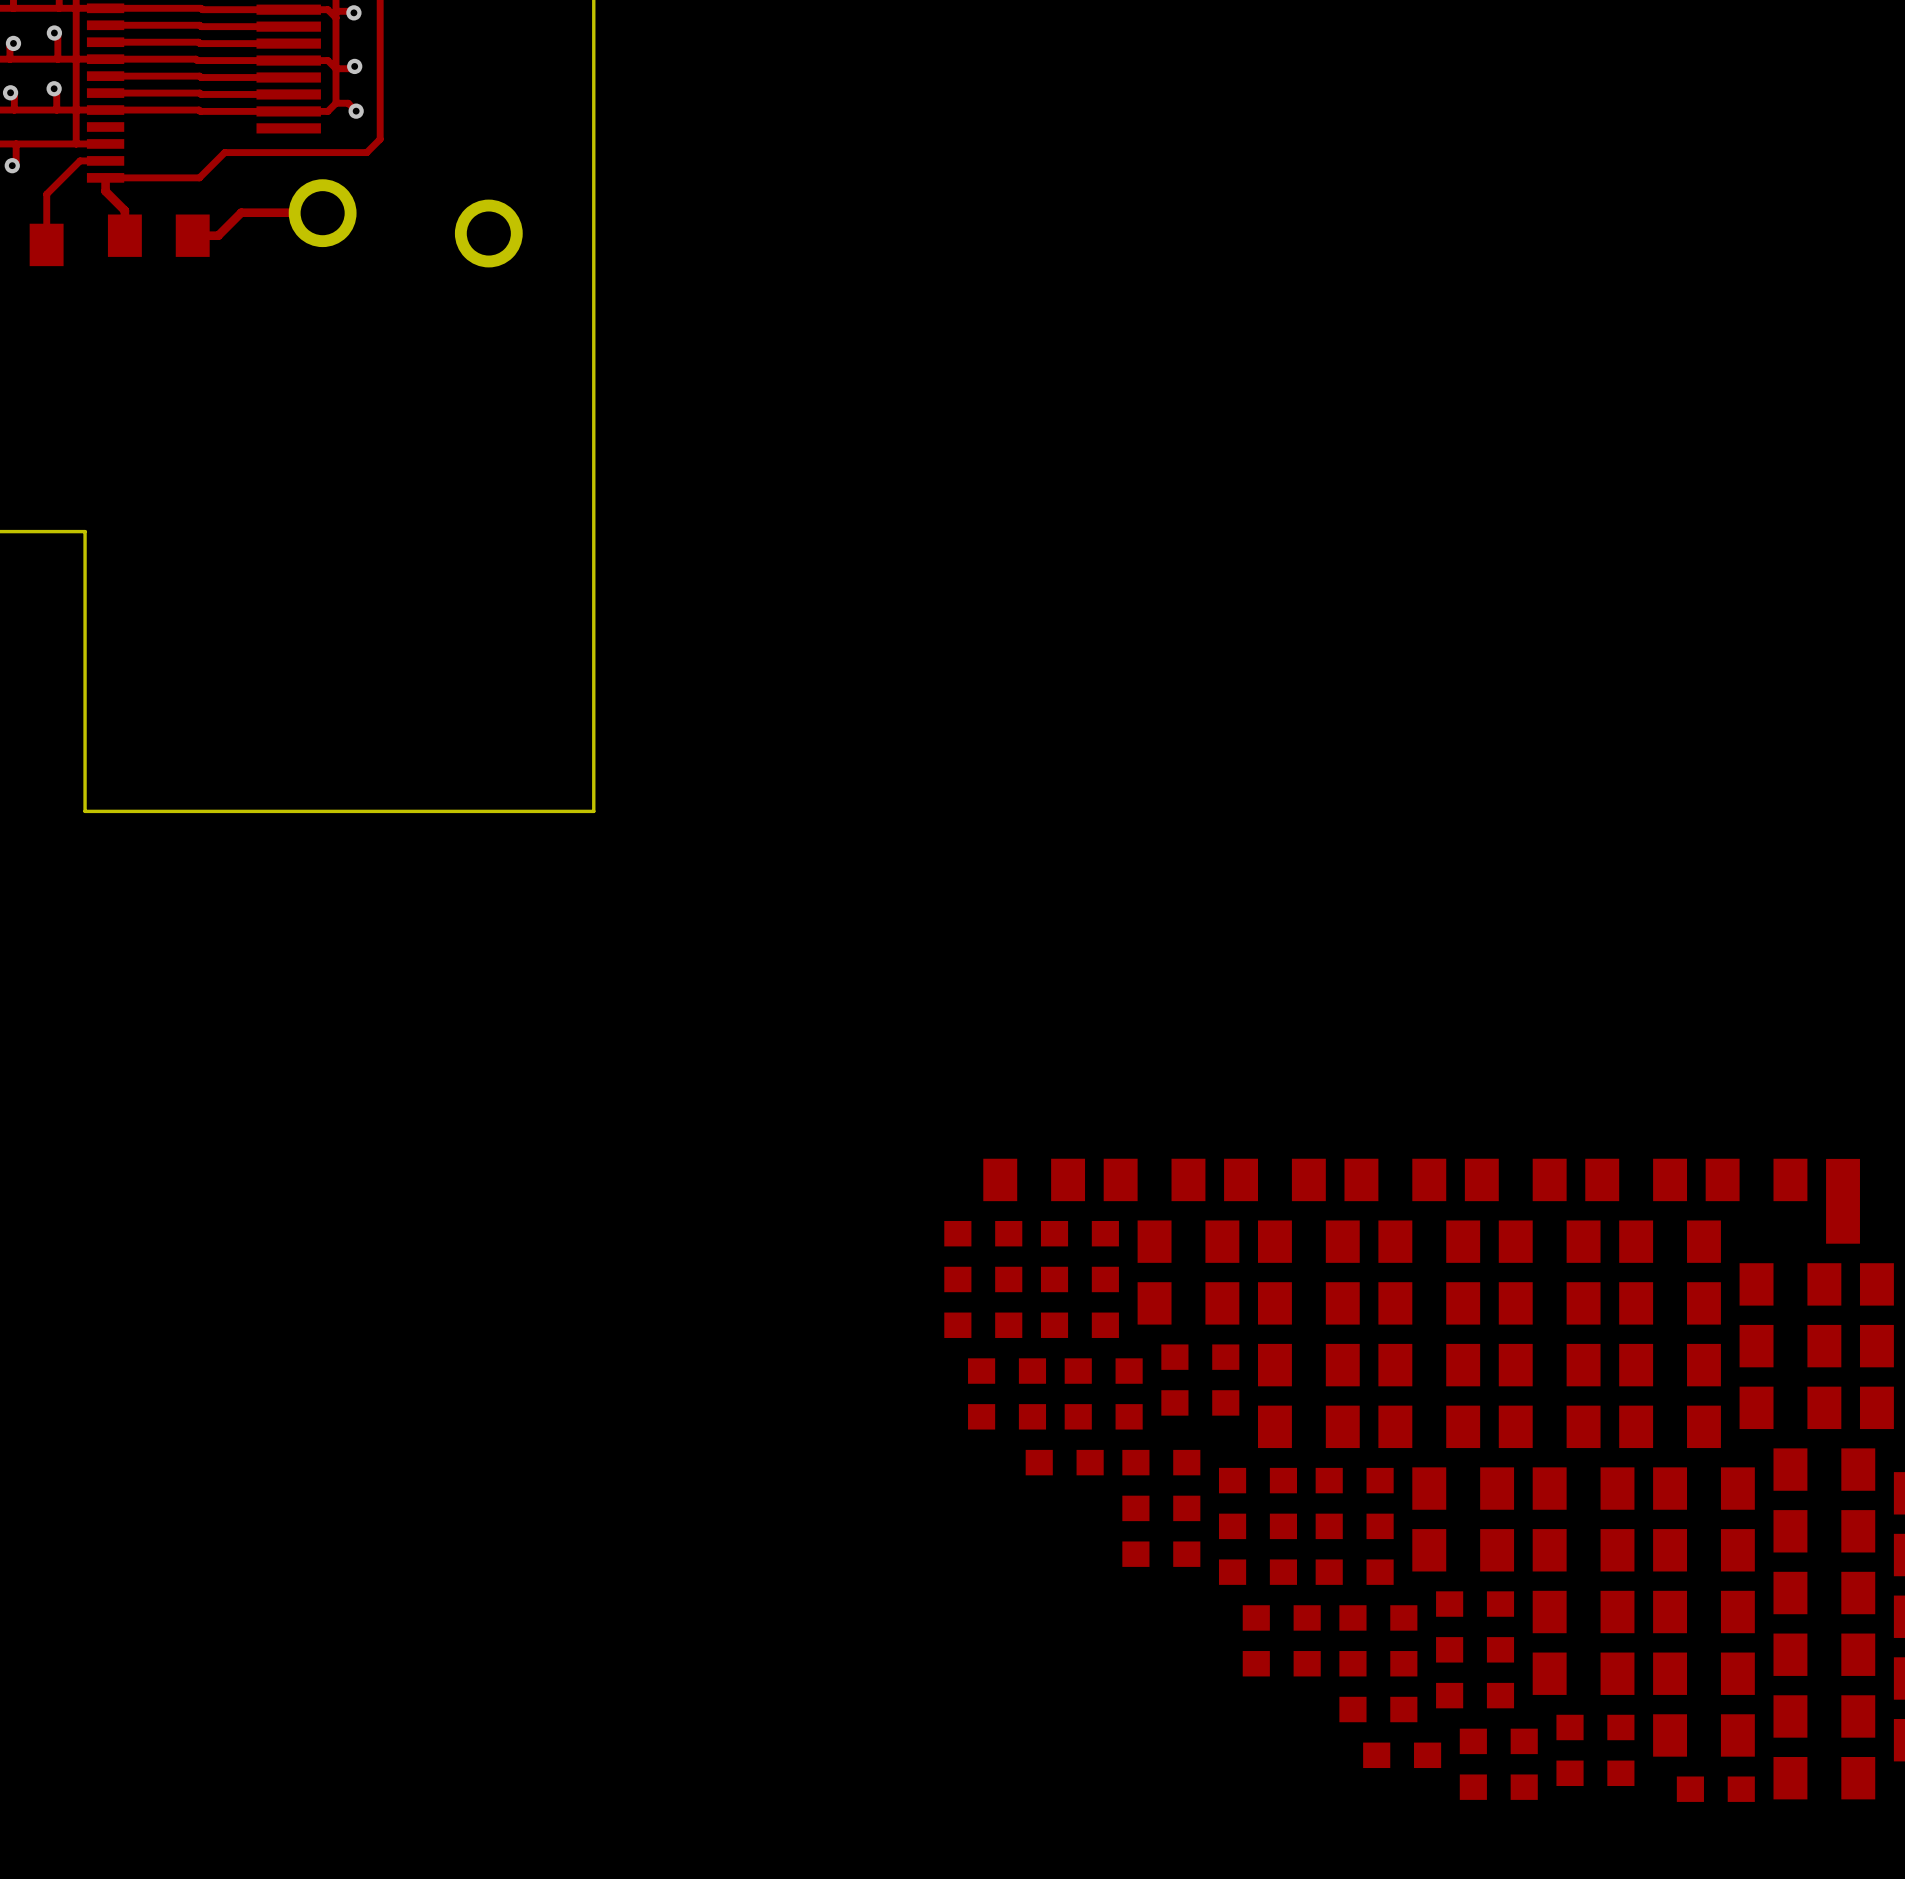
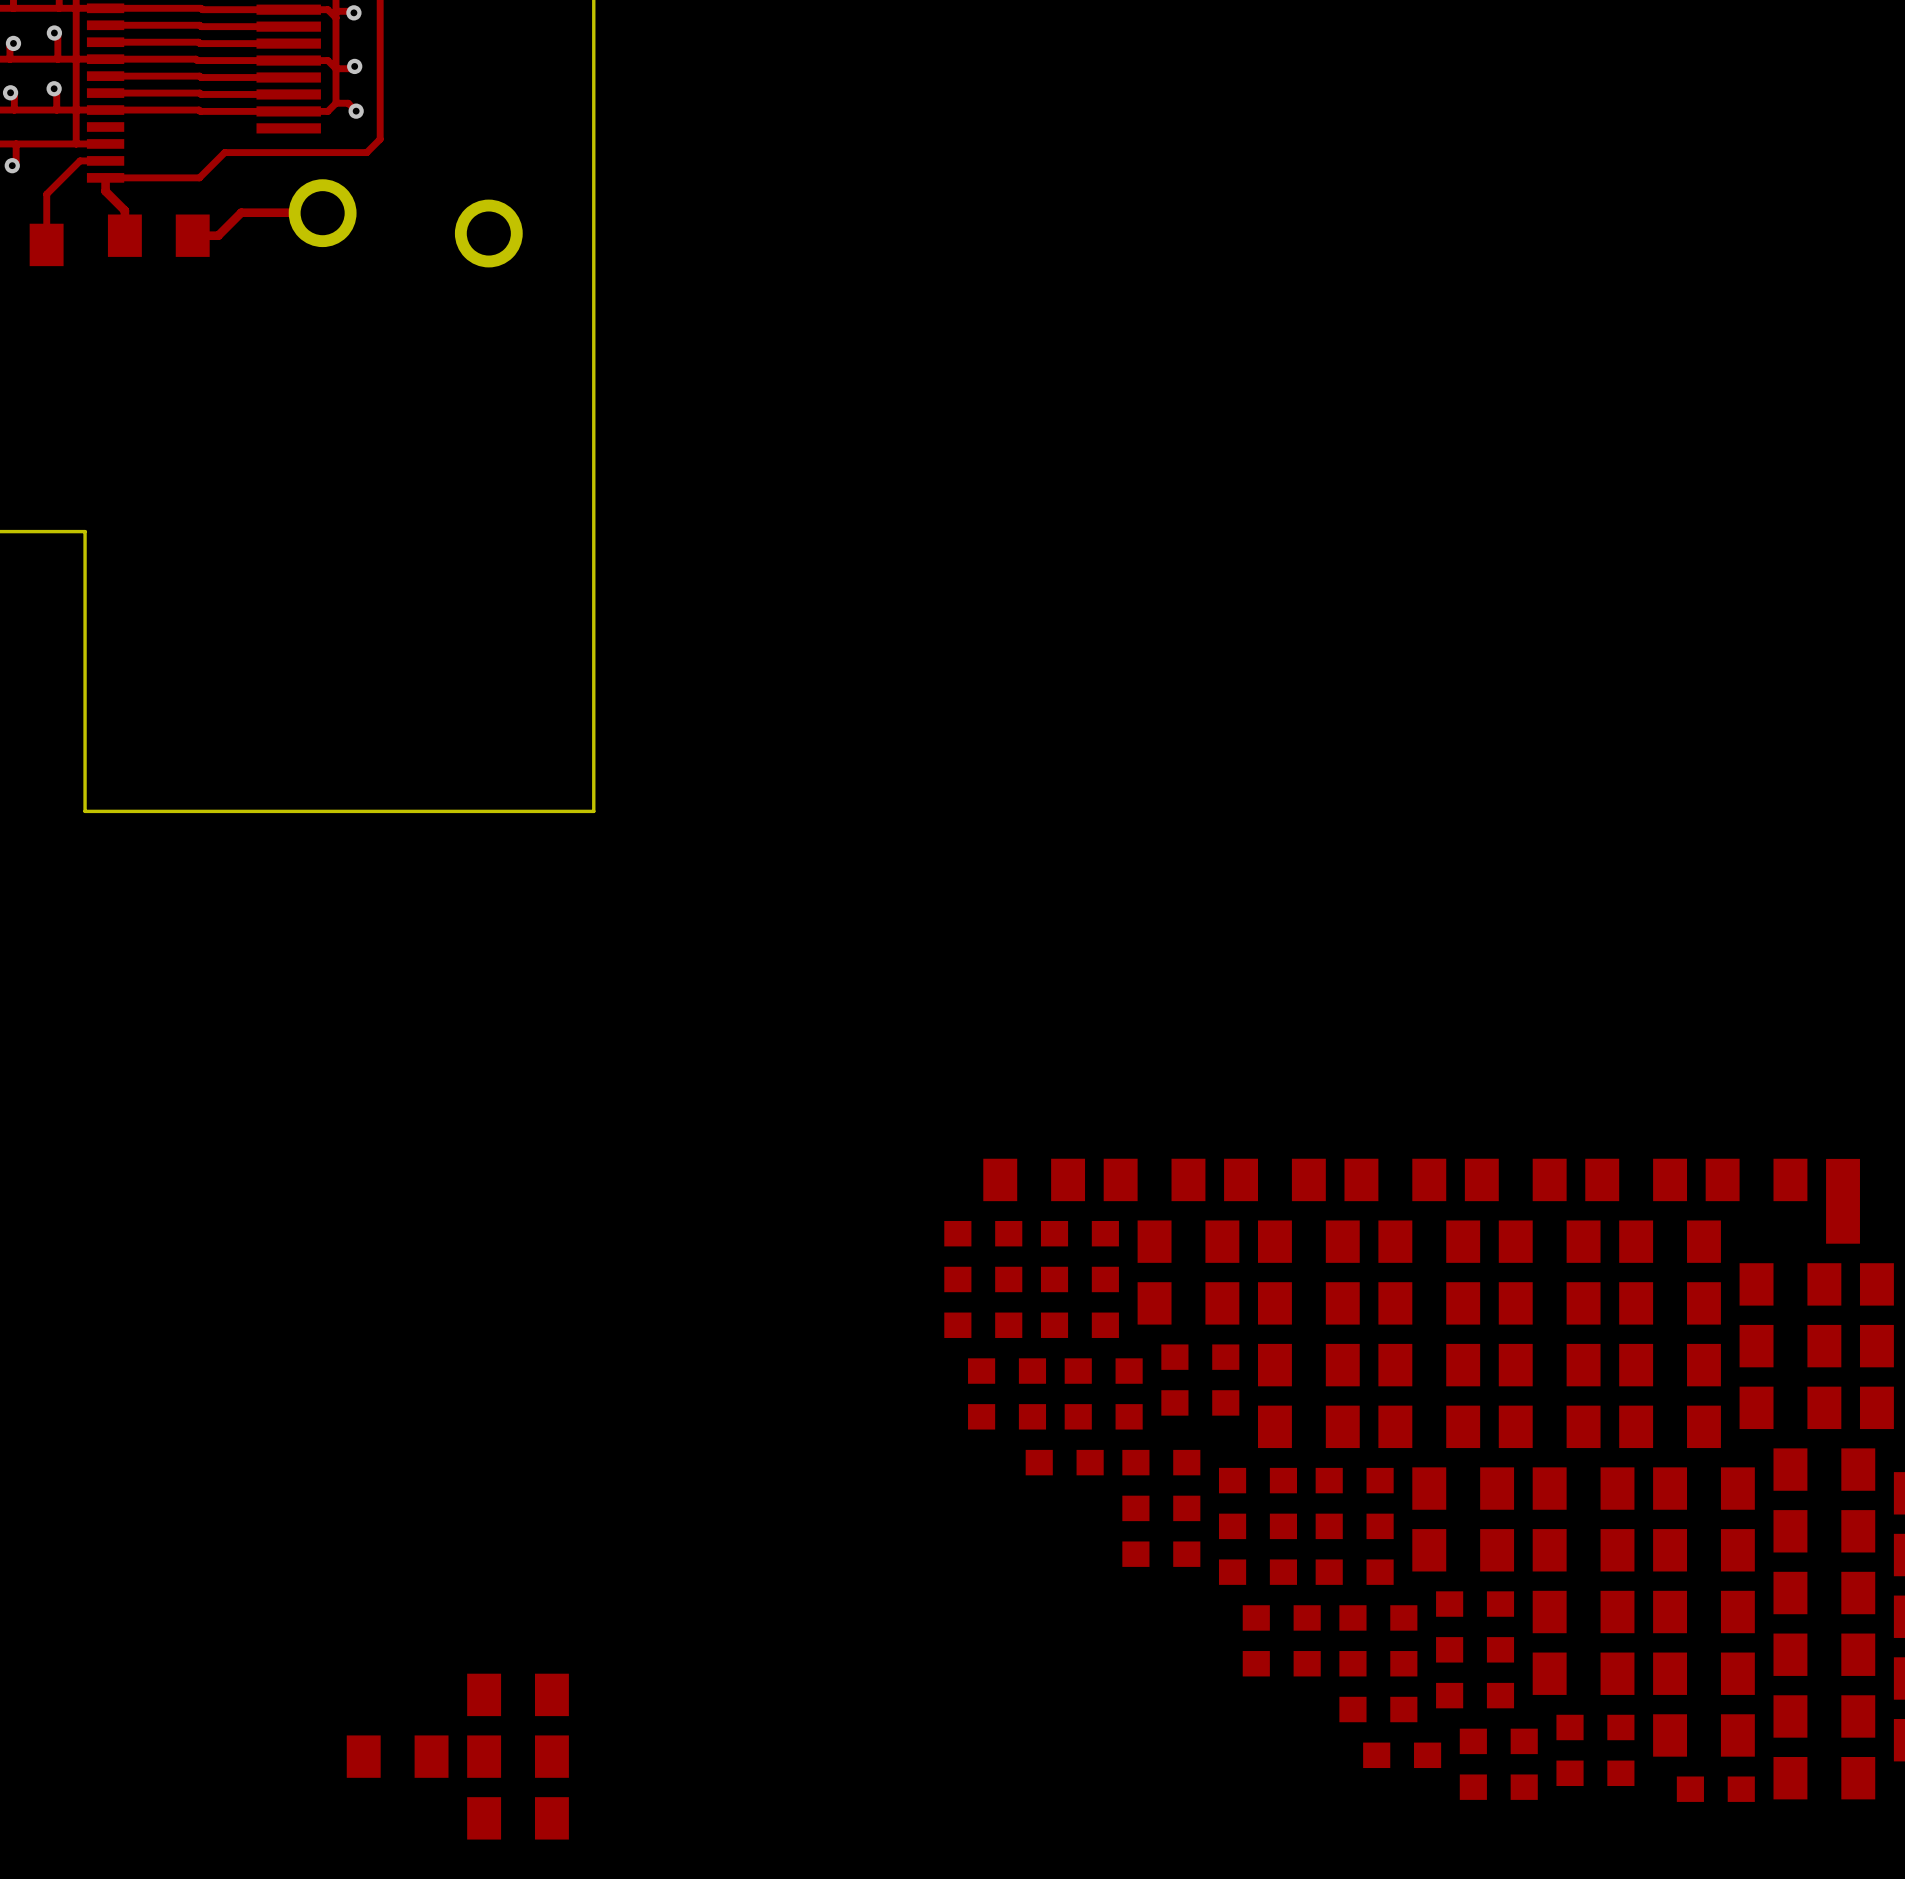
part: none -> (518, 1694)
part: none -> (397, 1756)
part: none -> (518, 1756)
part: none -> (518, 1818)

